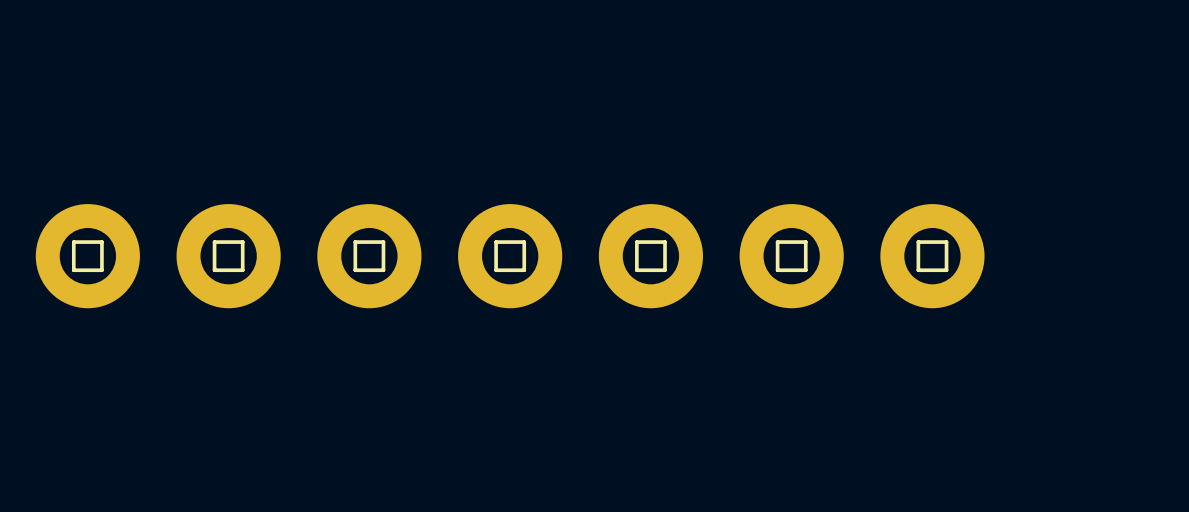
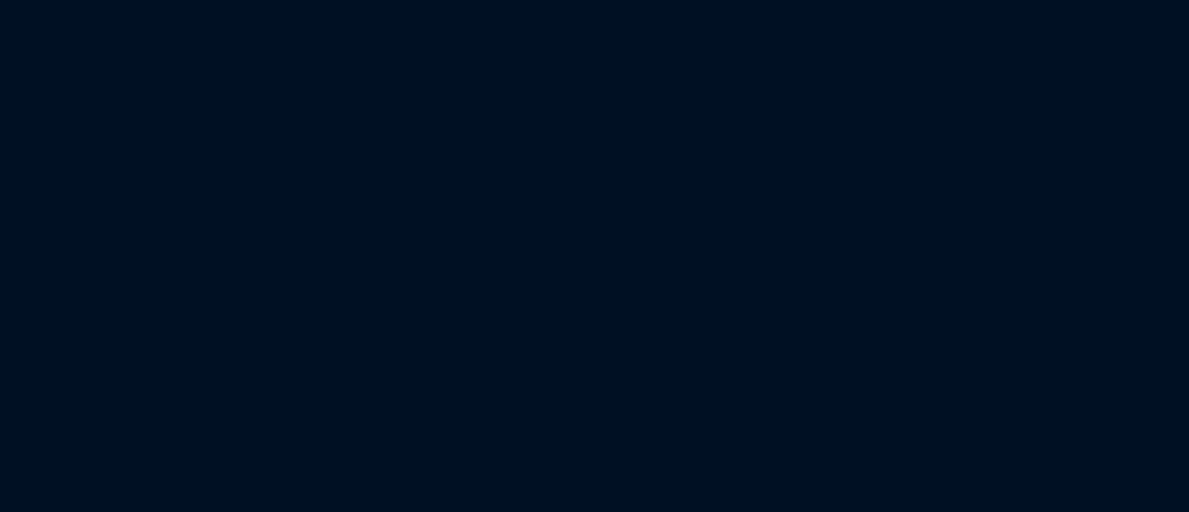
part: (510, 256) -> none

